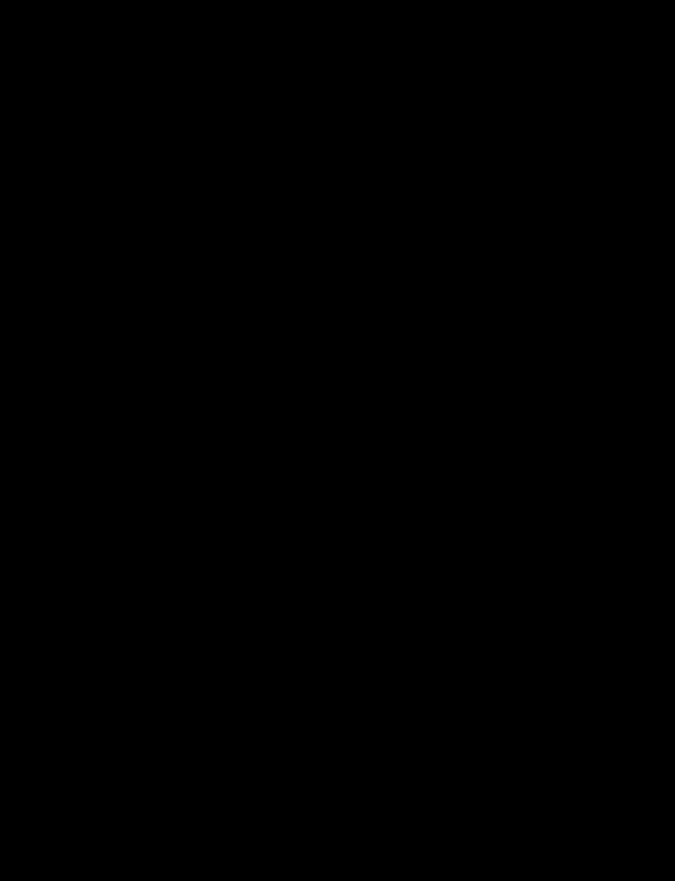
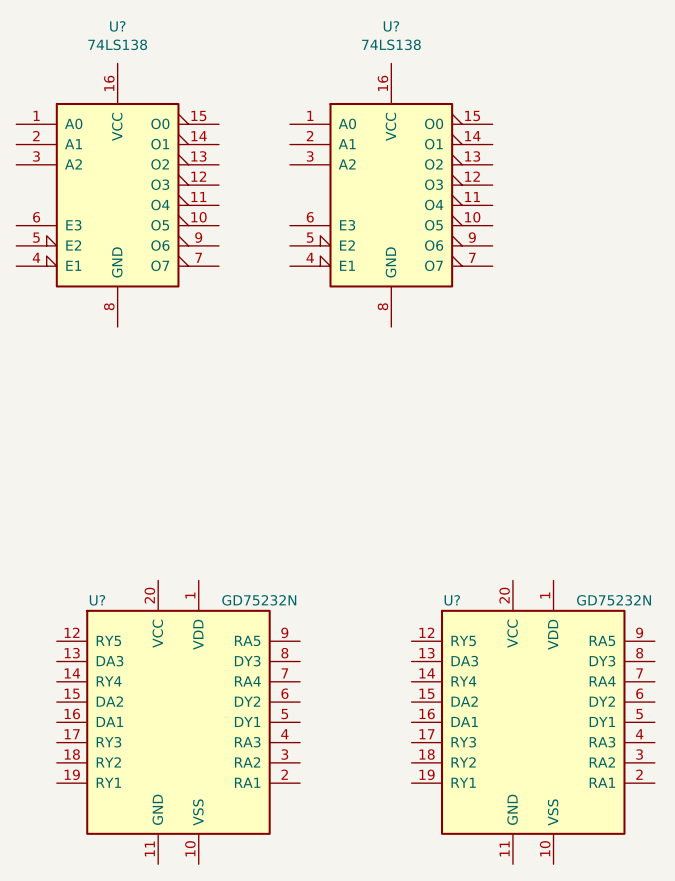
U?: none -> 74LS138 (117, 195)
U?: none -> 74LS138 (391, 195)
U?: none -> GD75232N (178, 722)
U?: none -> GD75232N (533, 722)

